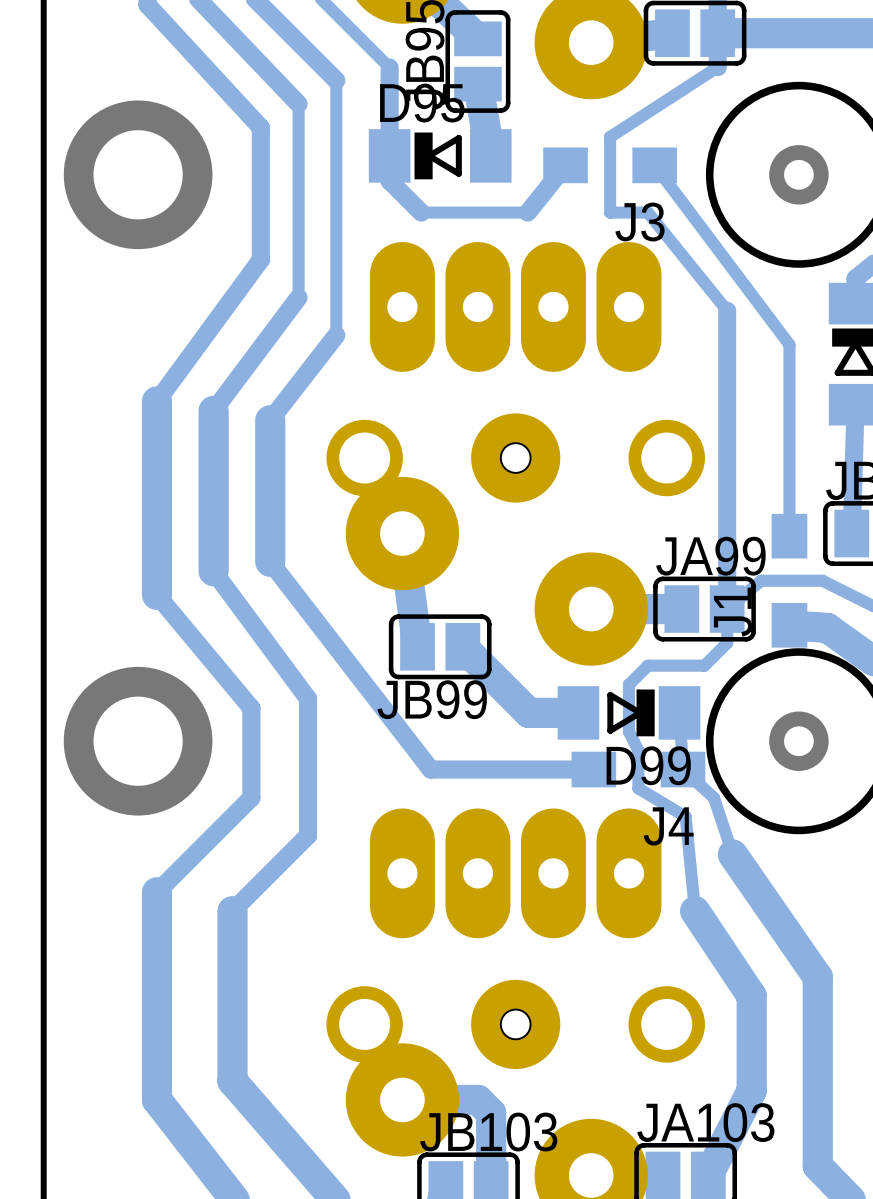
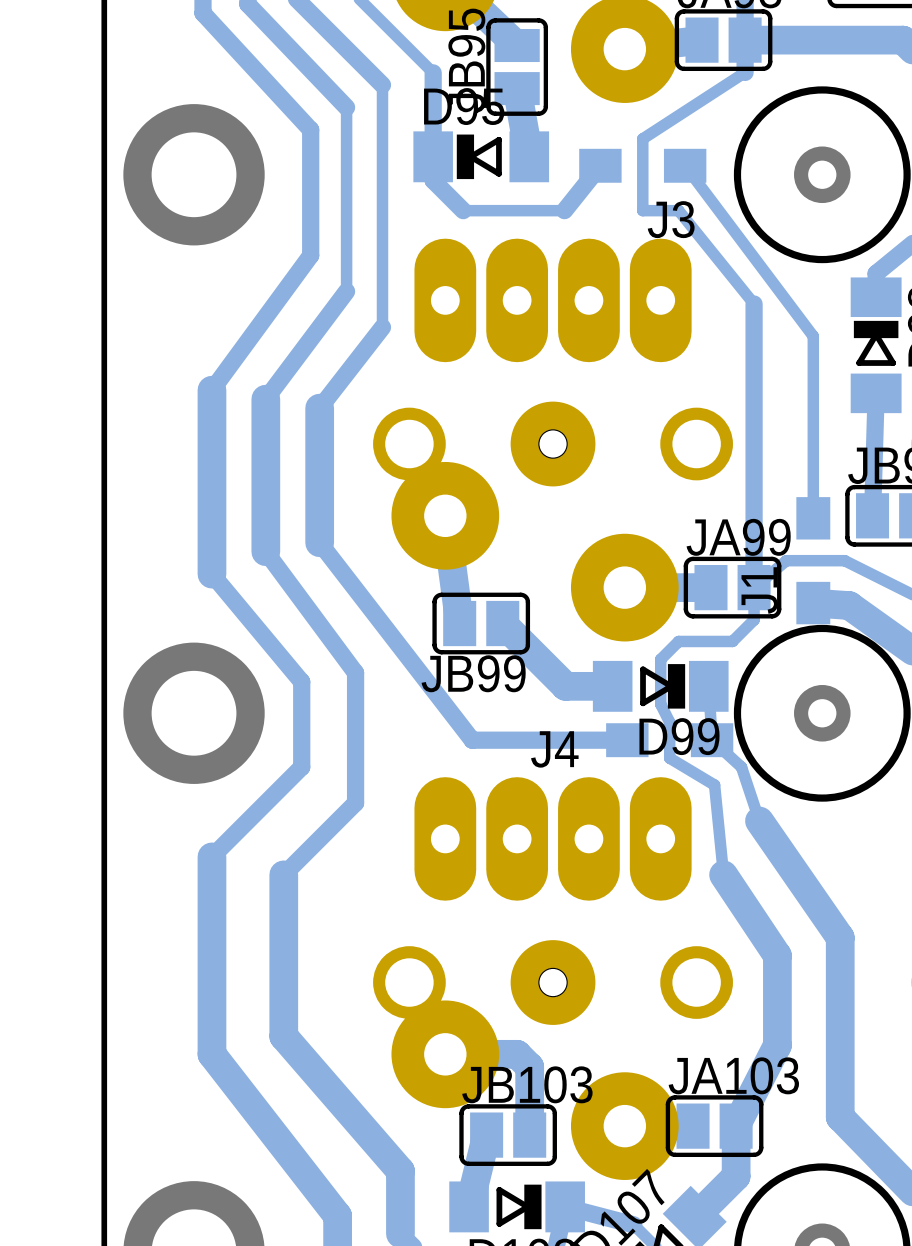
J4 name position: J4 (668, 826) -> J4 (554, 749)

